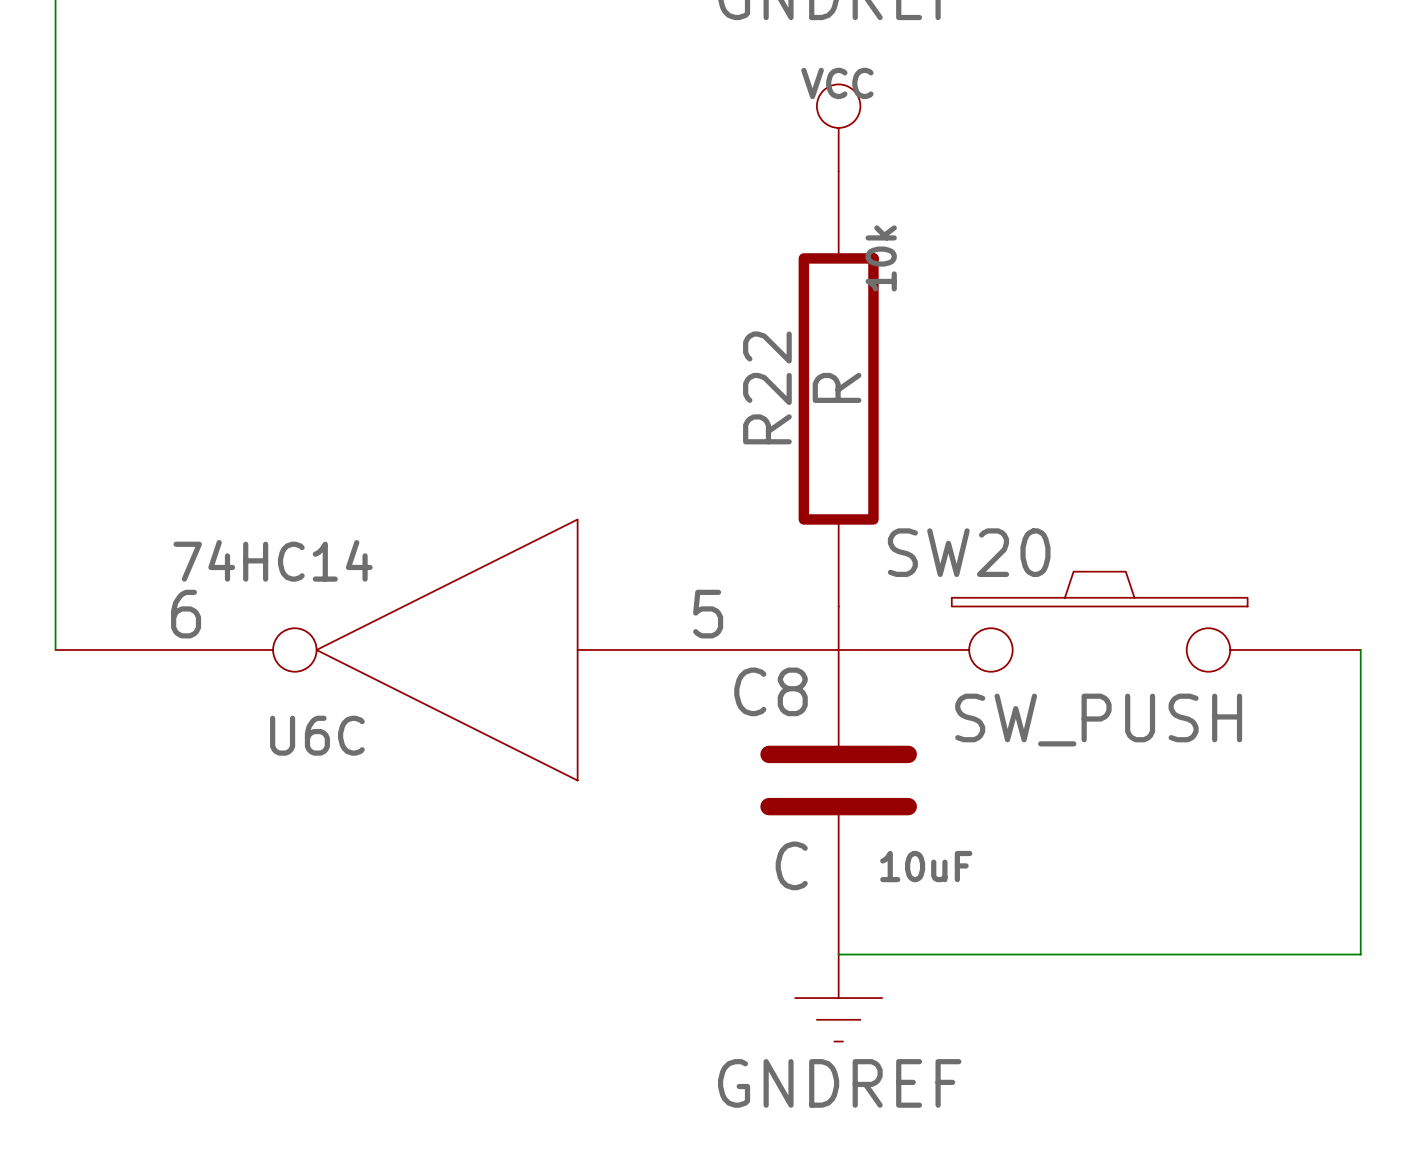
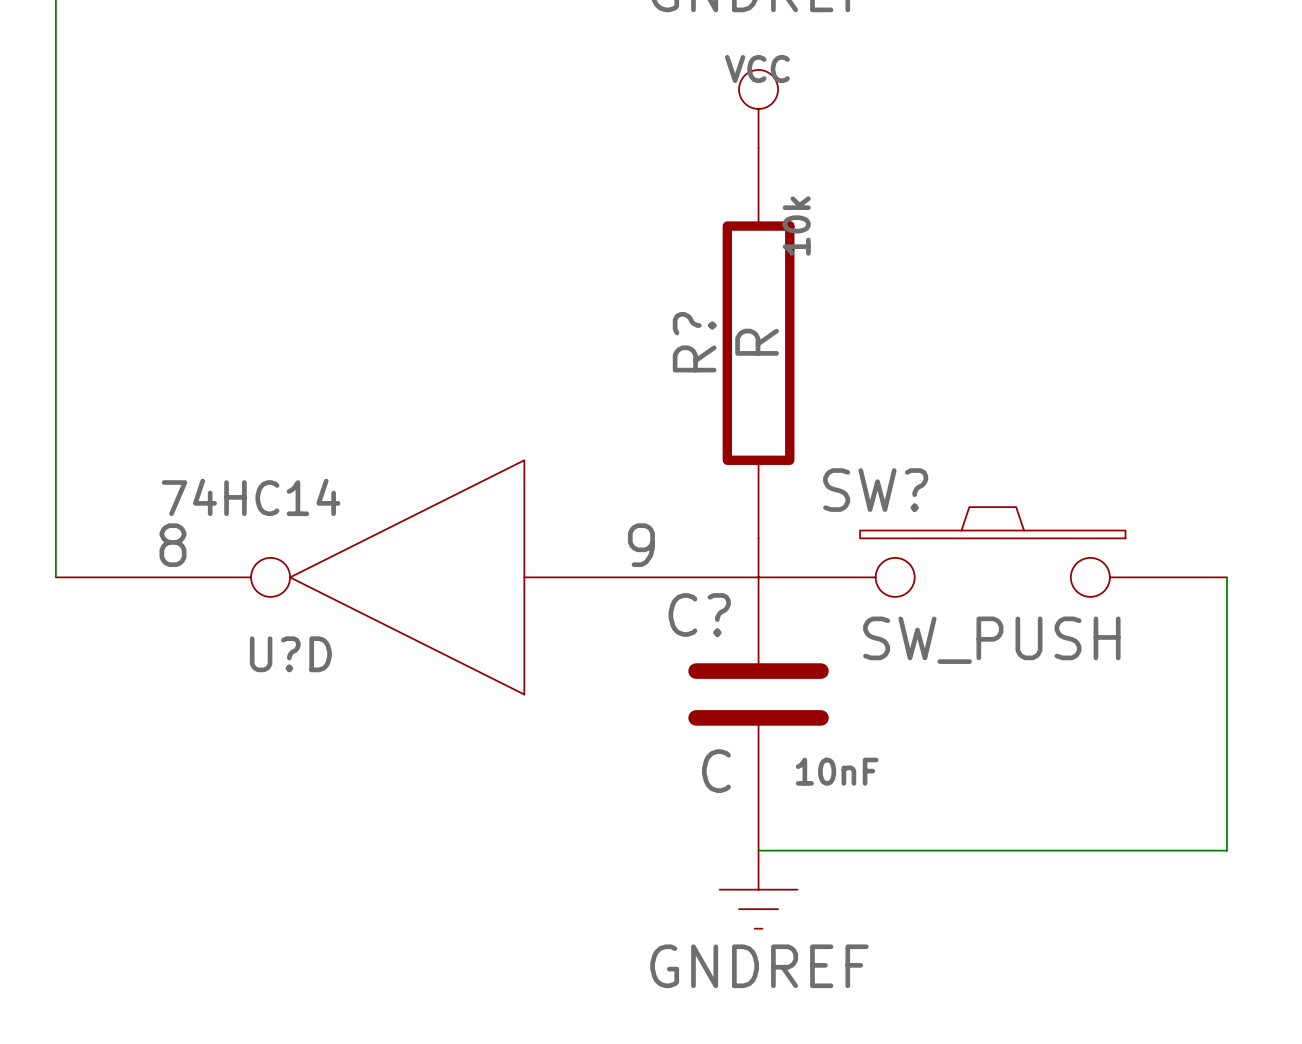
R22 name: R22 (767, 387) -> R? (694, 342)
SW20 name: SW20 (969, 552) -> SW? (875, 490)
U6C pin number: 6 (186, 614) -> 8 (173, 545)
U6C pin number: 5 (708, 614) -> 9 (641, 545)
C8 name: C8 (770, 691) -> C? (699, 614)
U6C name: U6C (317, 735) -> U?D (290, 654)
C8 text: 10uF (926, 866) -> 10nF (837, 771)

